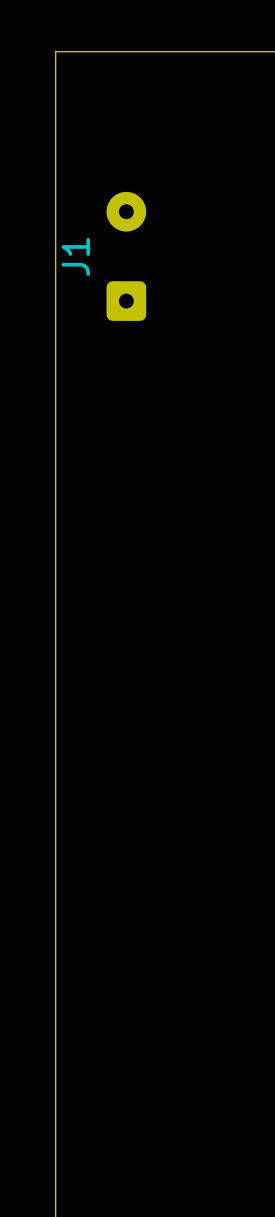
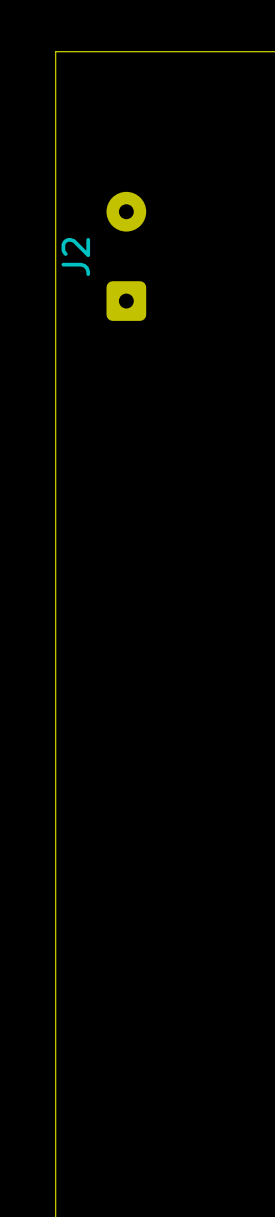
J1 name: J1 (75, 256) -> J2 (75, 256)

